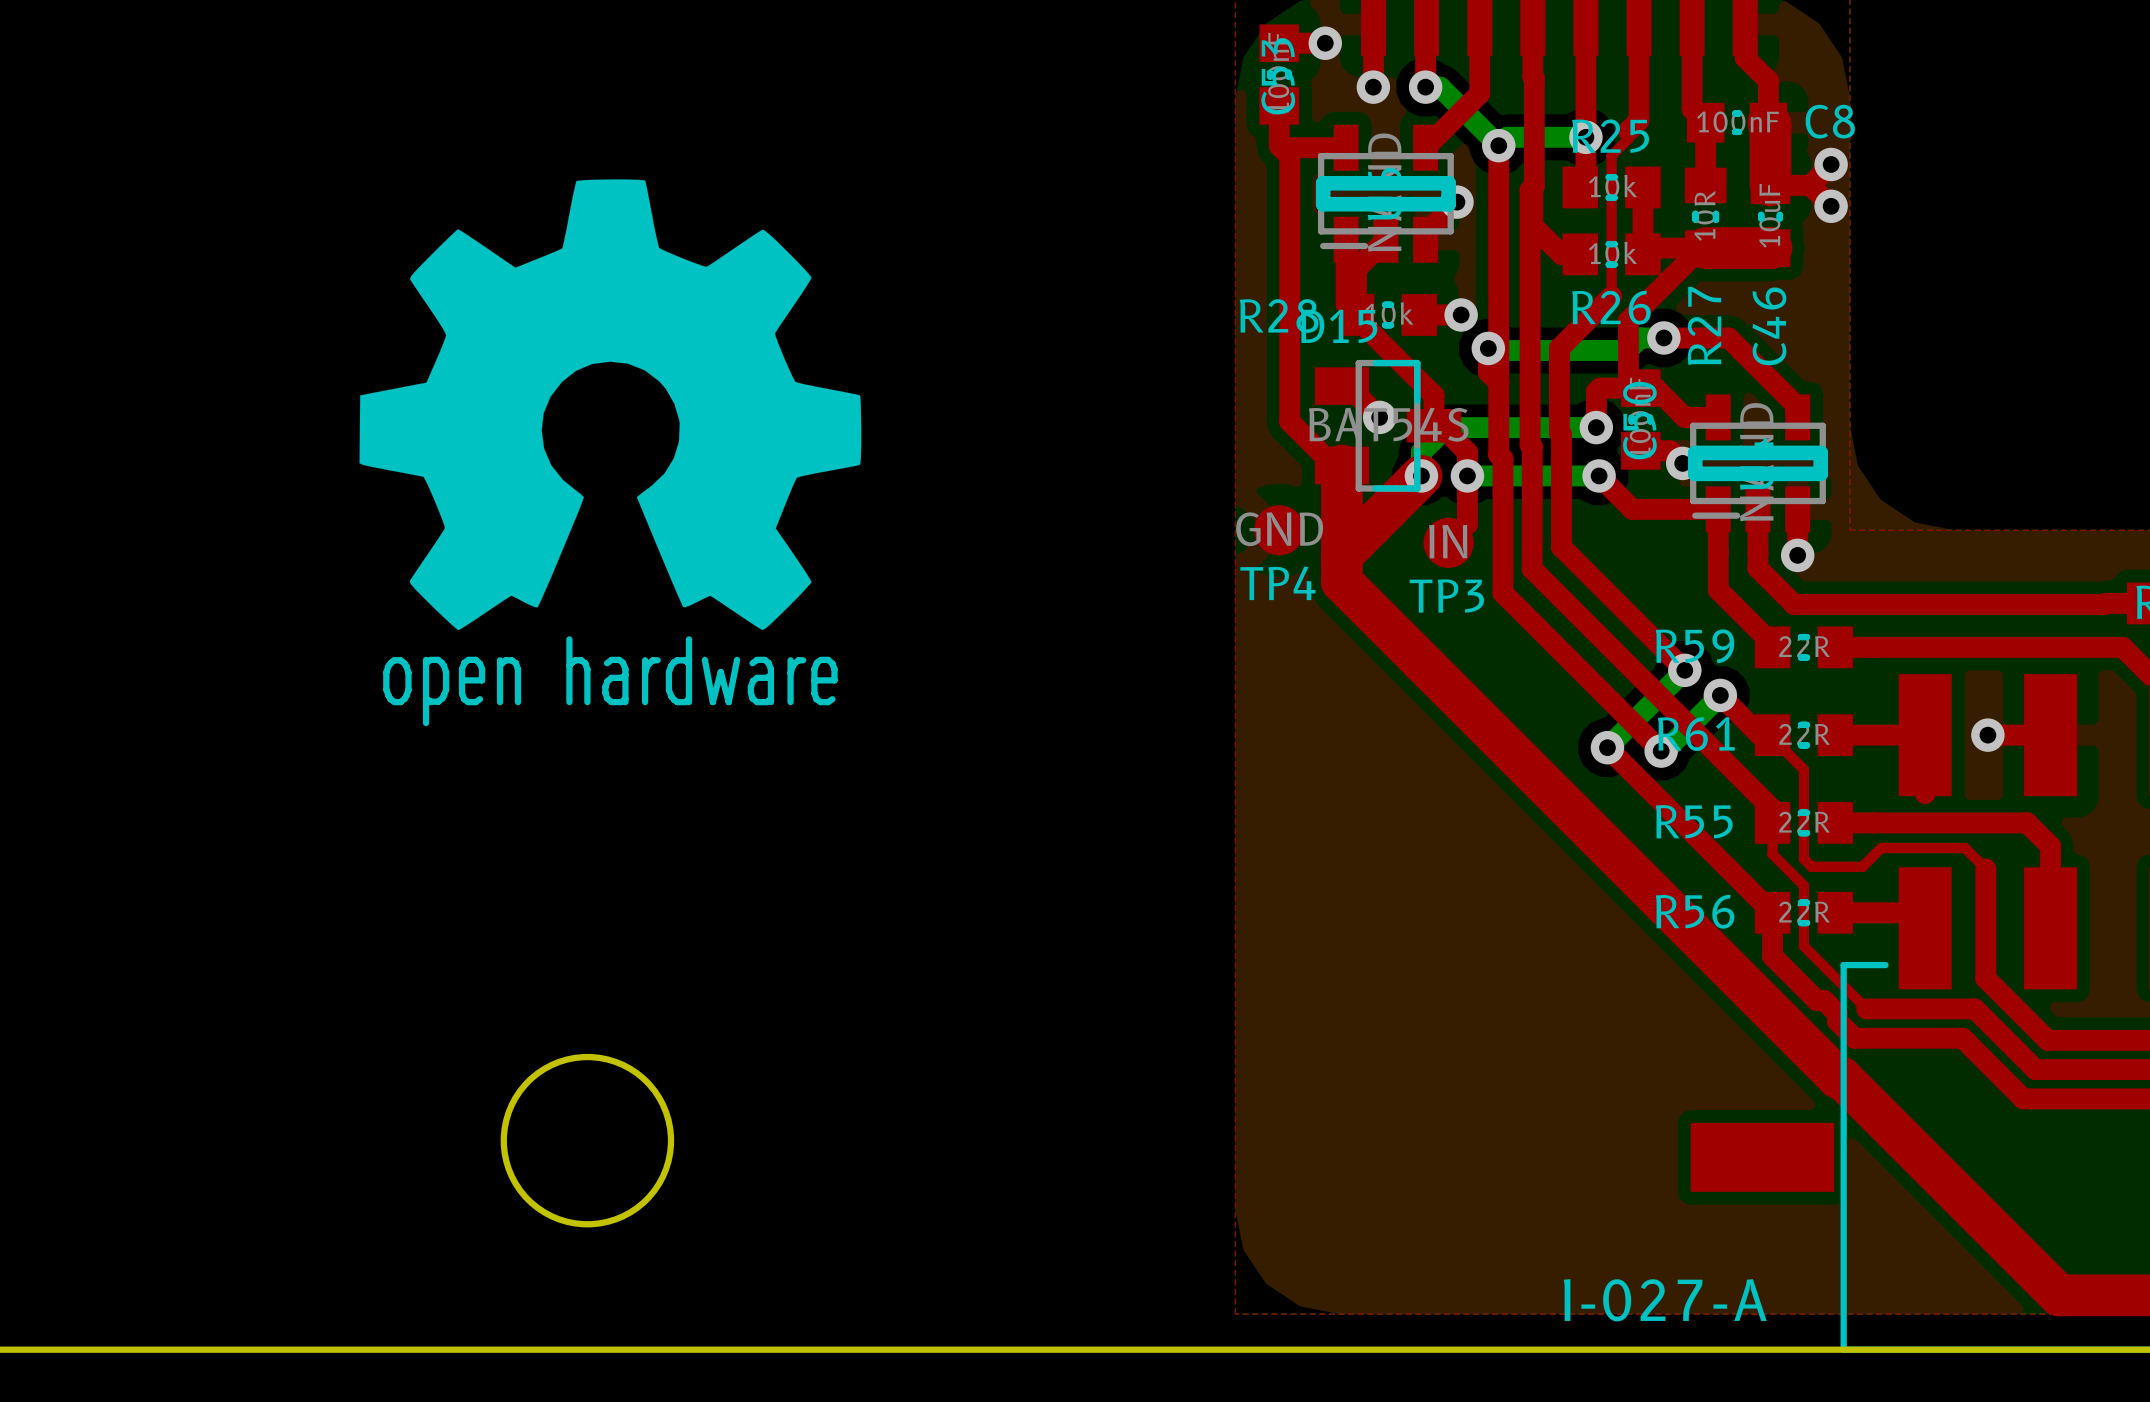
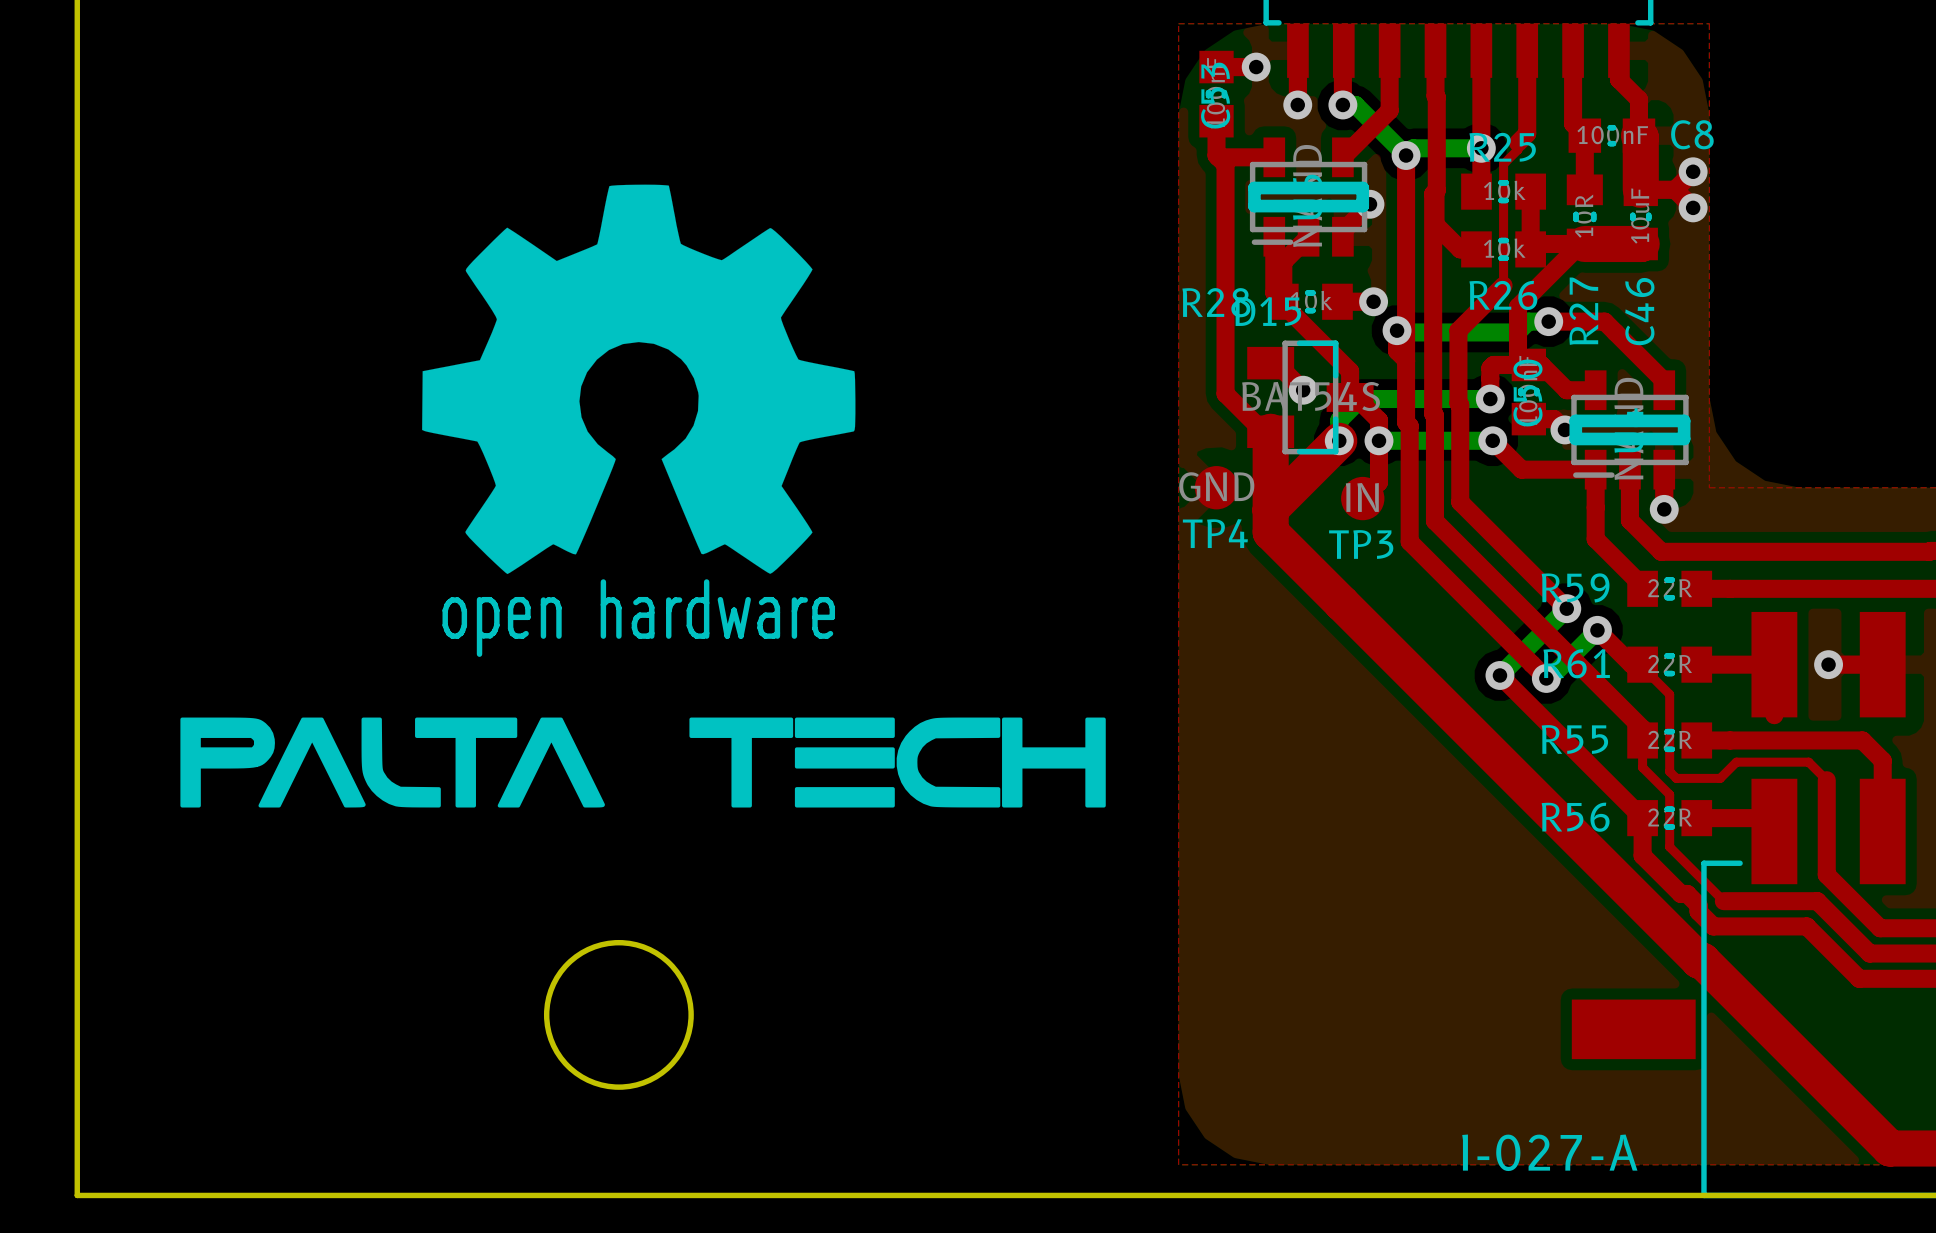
drawing: none -> [180, 717, 1106, 808]

